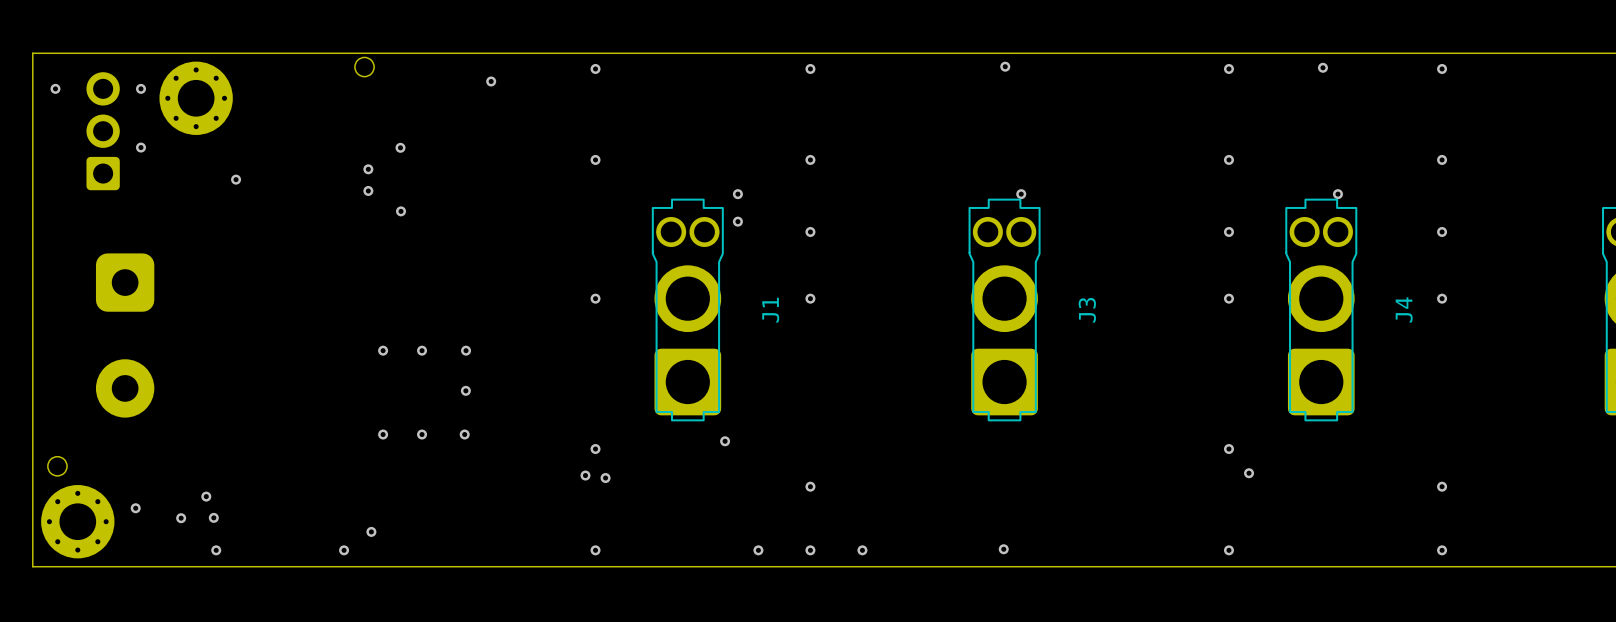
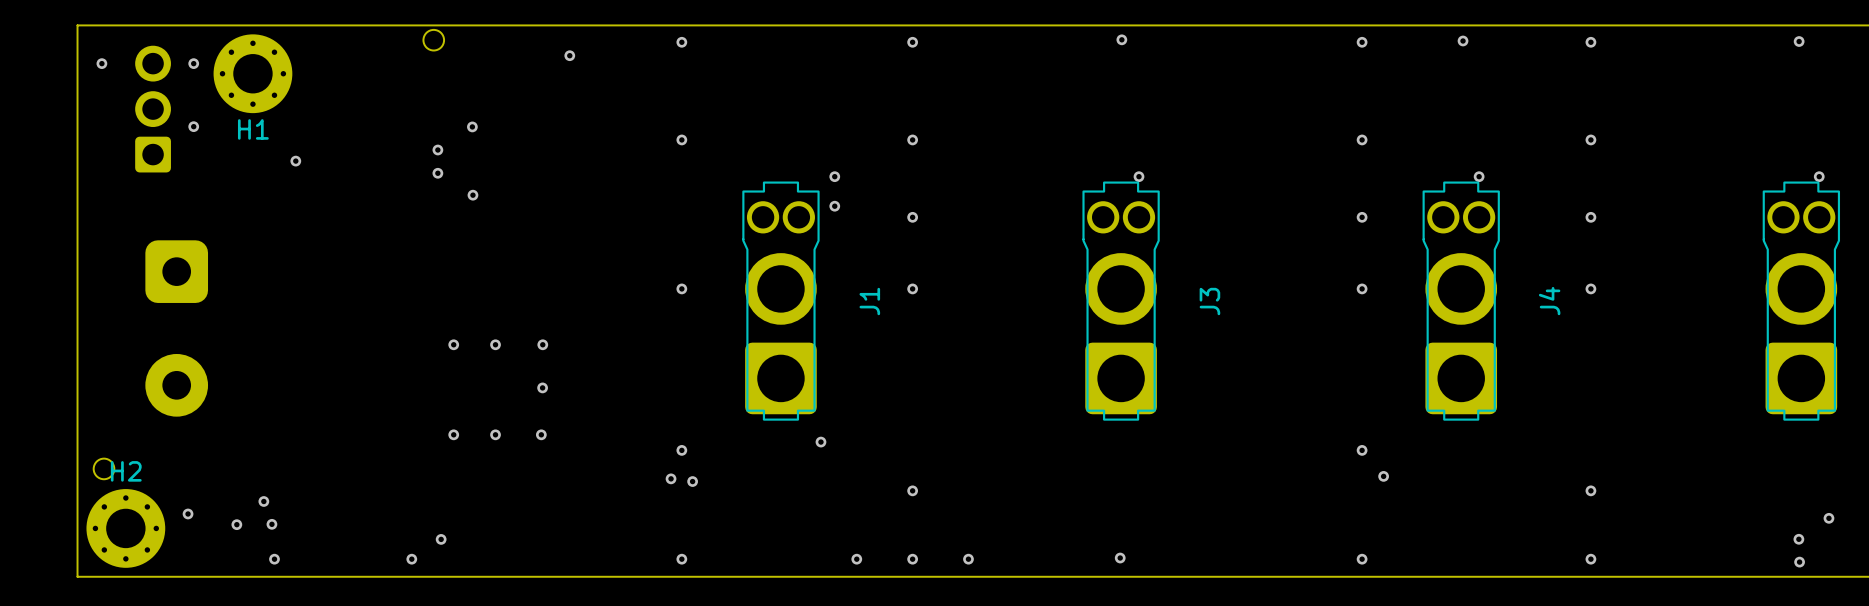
H1 name: none -> H1 (253, 129)
H2 name: none -> H2 (126, 471)

